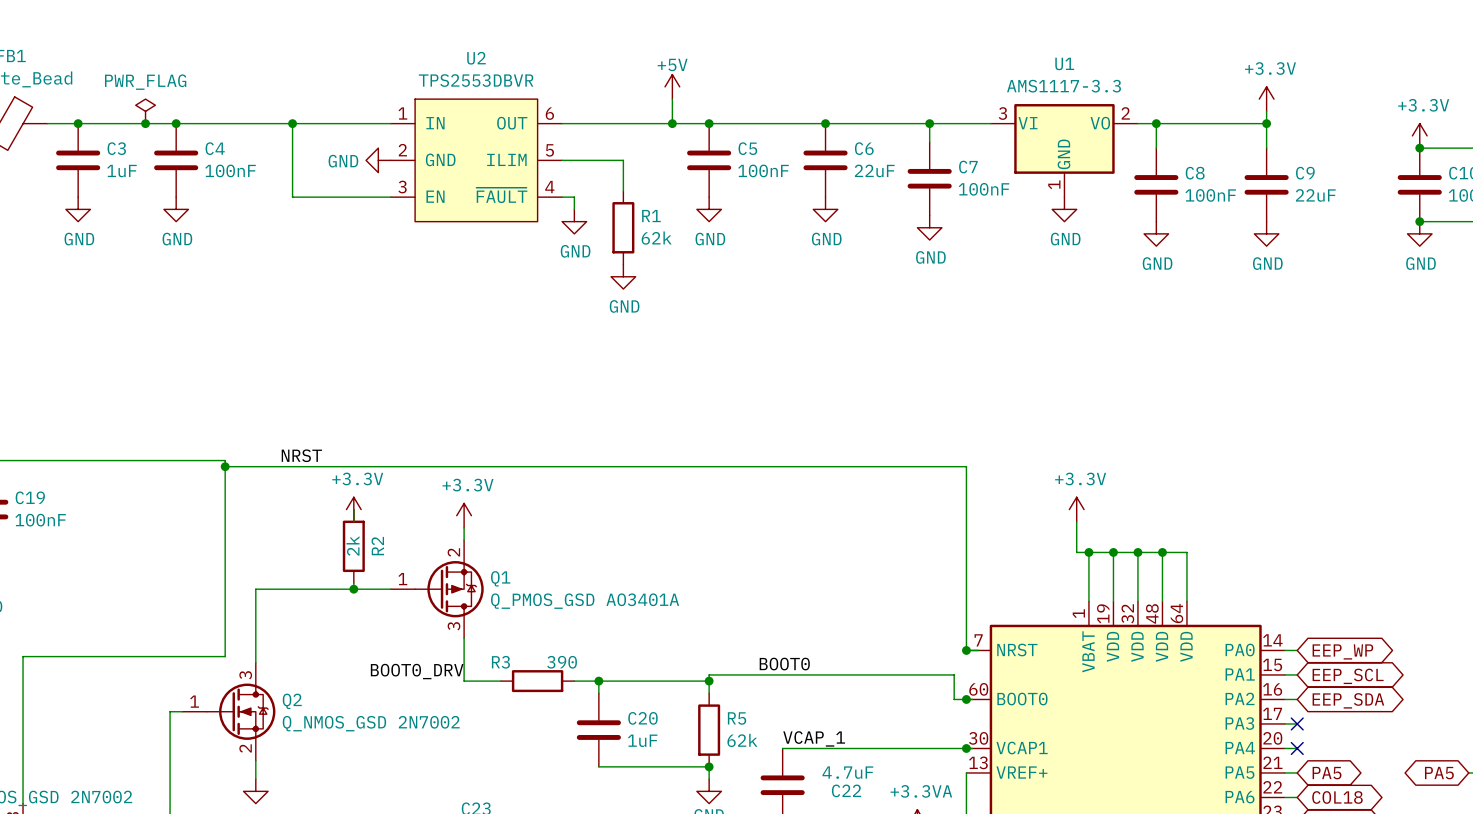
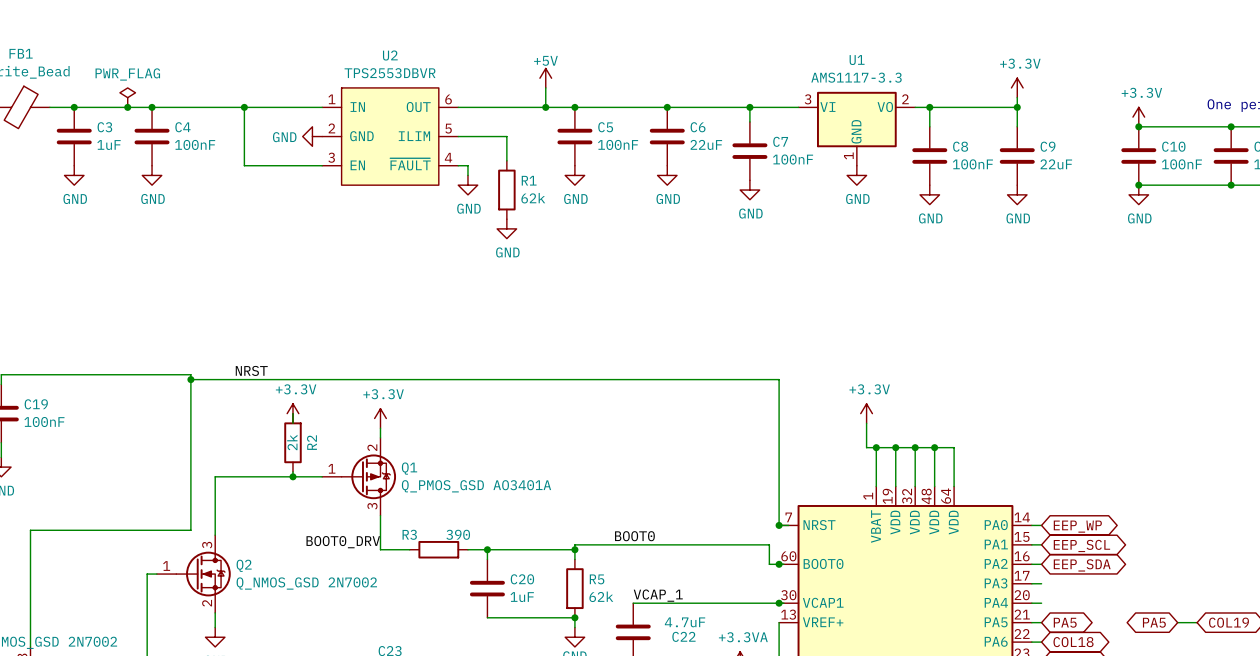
no-connect mark: (1297, 723) -> none
no-connect mark: (1297, 748) -> none

